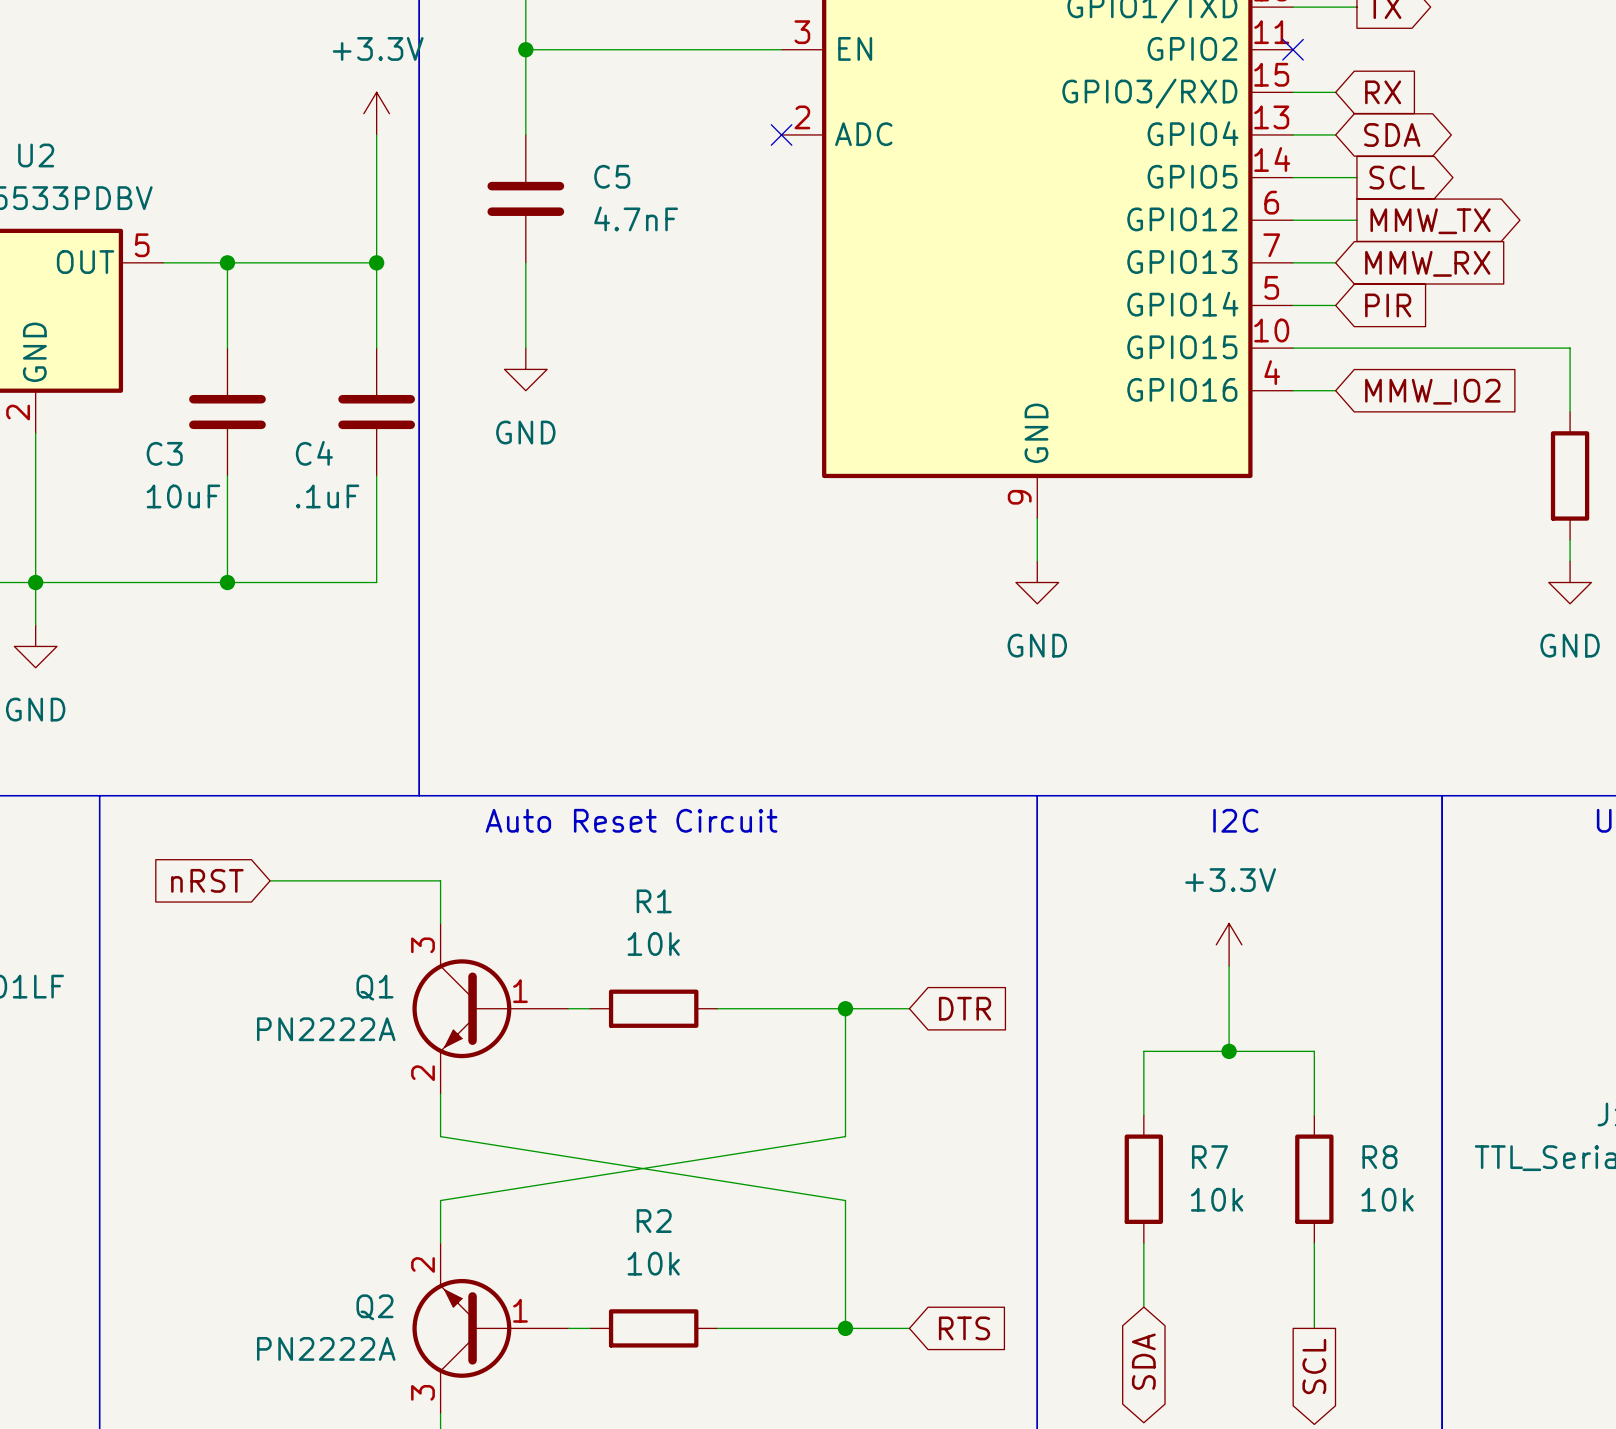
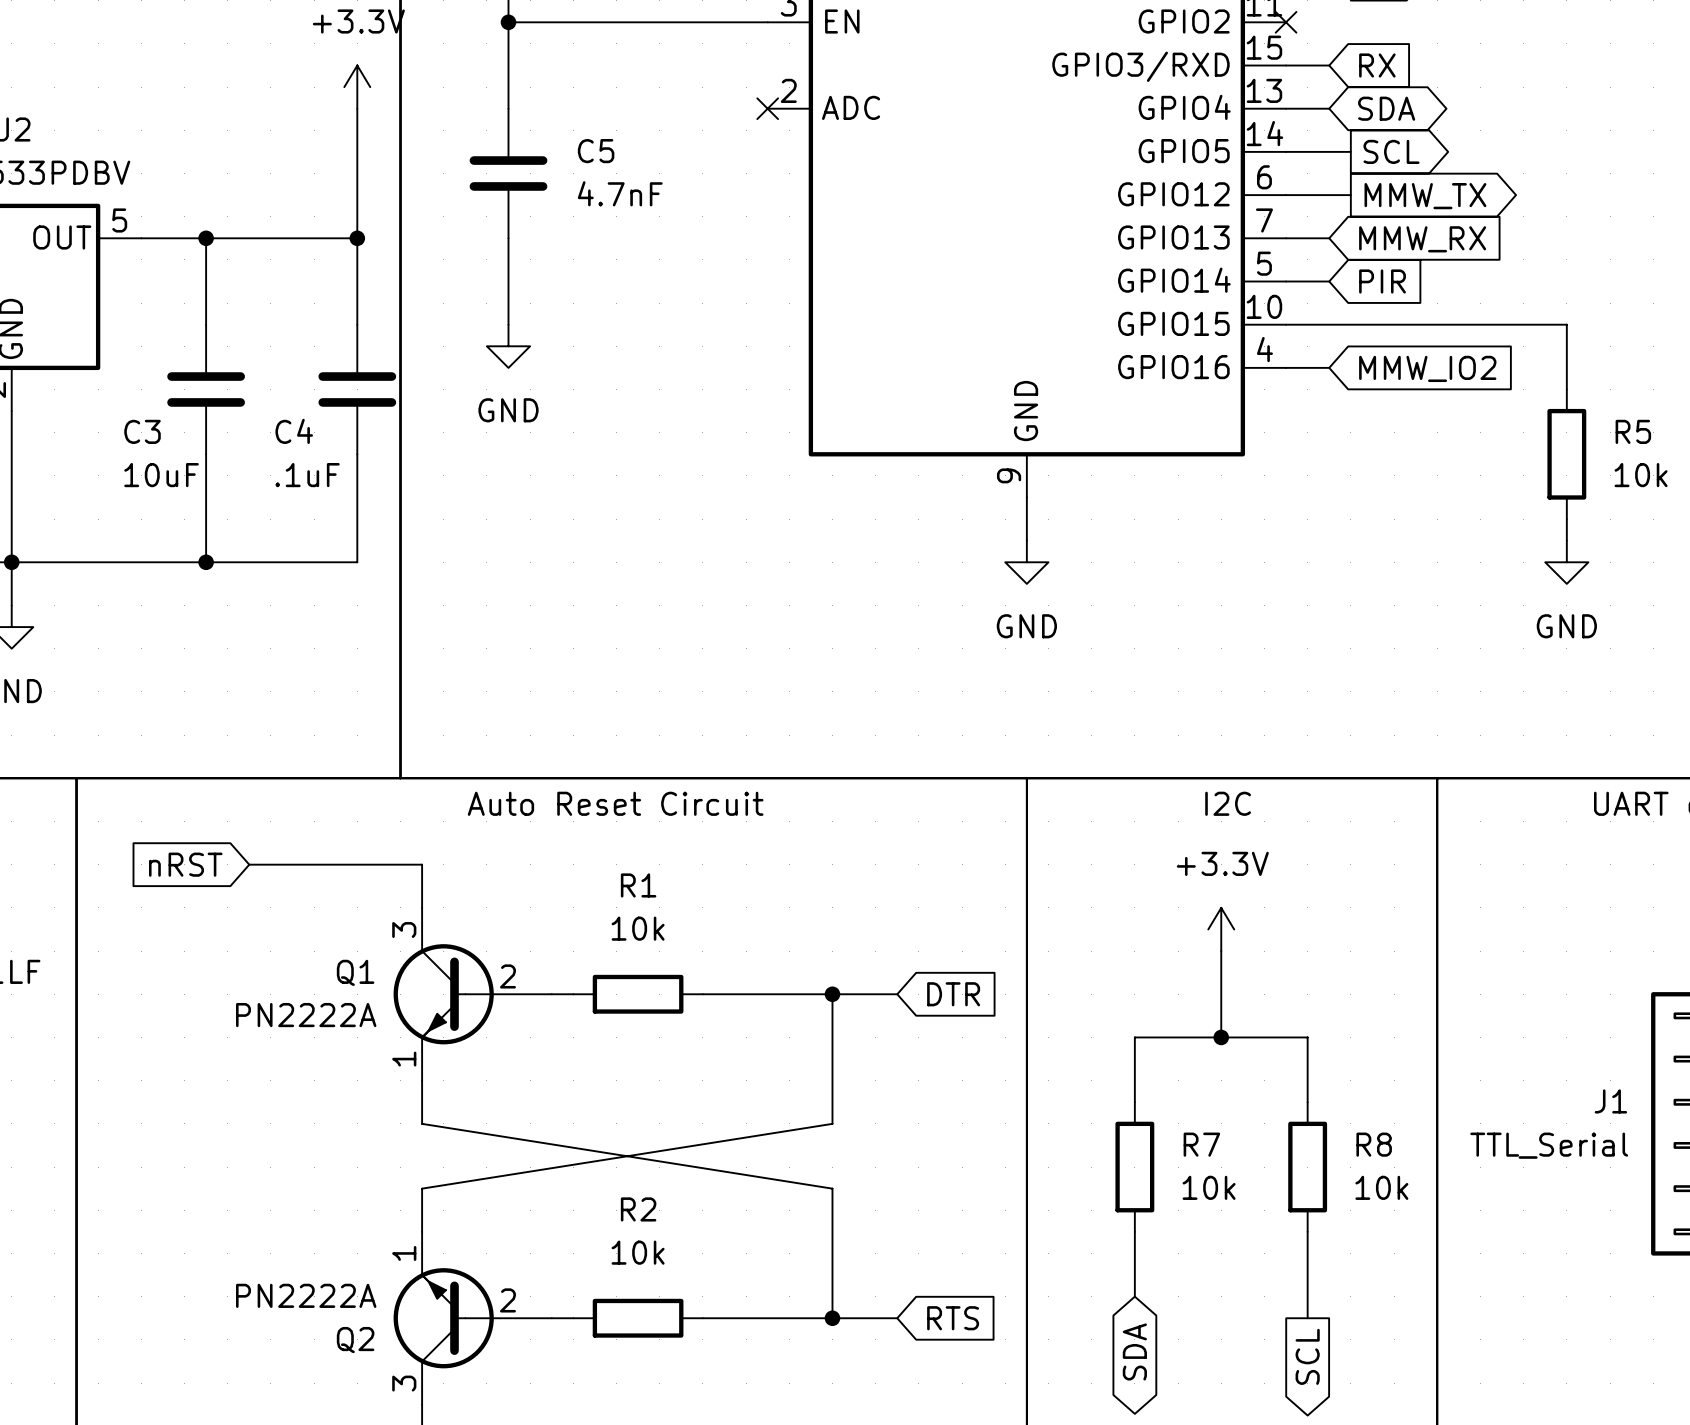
Q1 symbol: [412, 923, 569, 1094] -> [393, 907, 552, 1081]
Q2 symbol: [412, 1243, 569, 1414] -> [393, 1231, 552, 1405]
Q2 name position: Q2 (374, 1307) -> Q2 (355, 1340)
Q2 value position: PN2222A (326, 1348) -> PN2222A (306, 1295)

